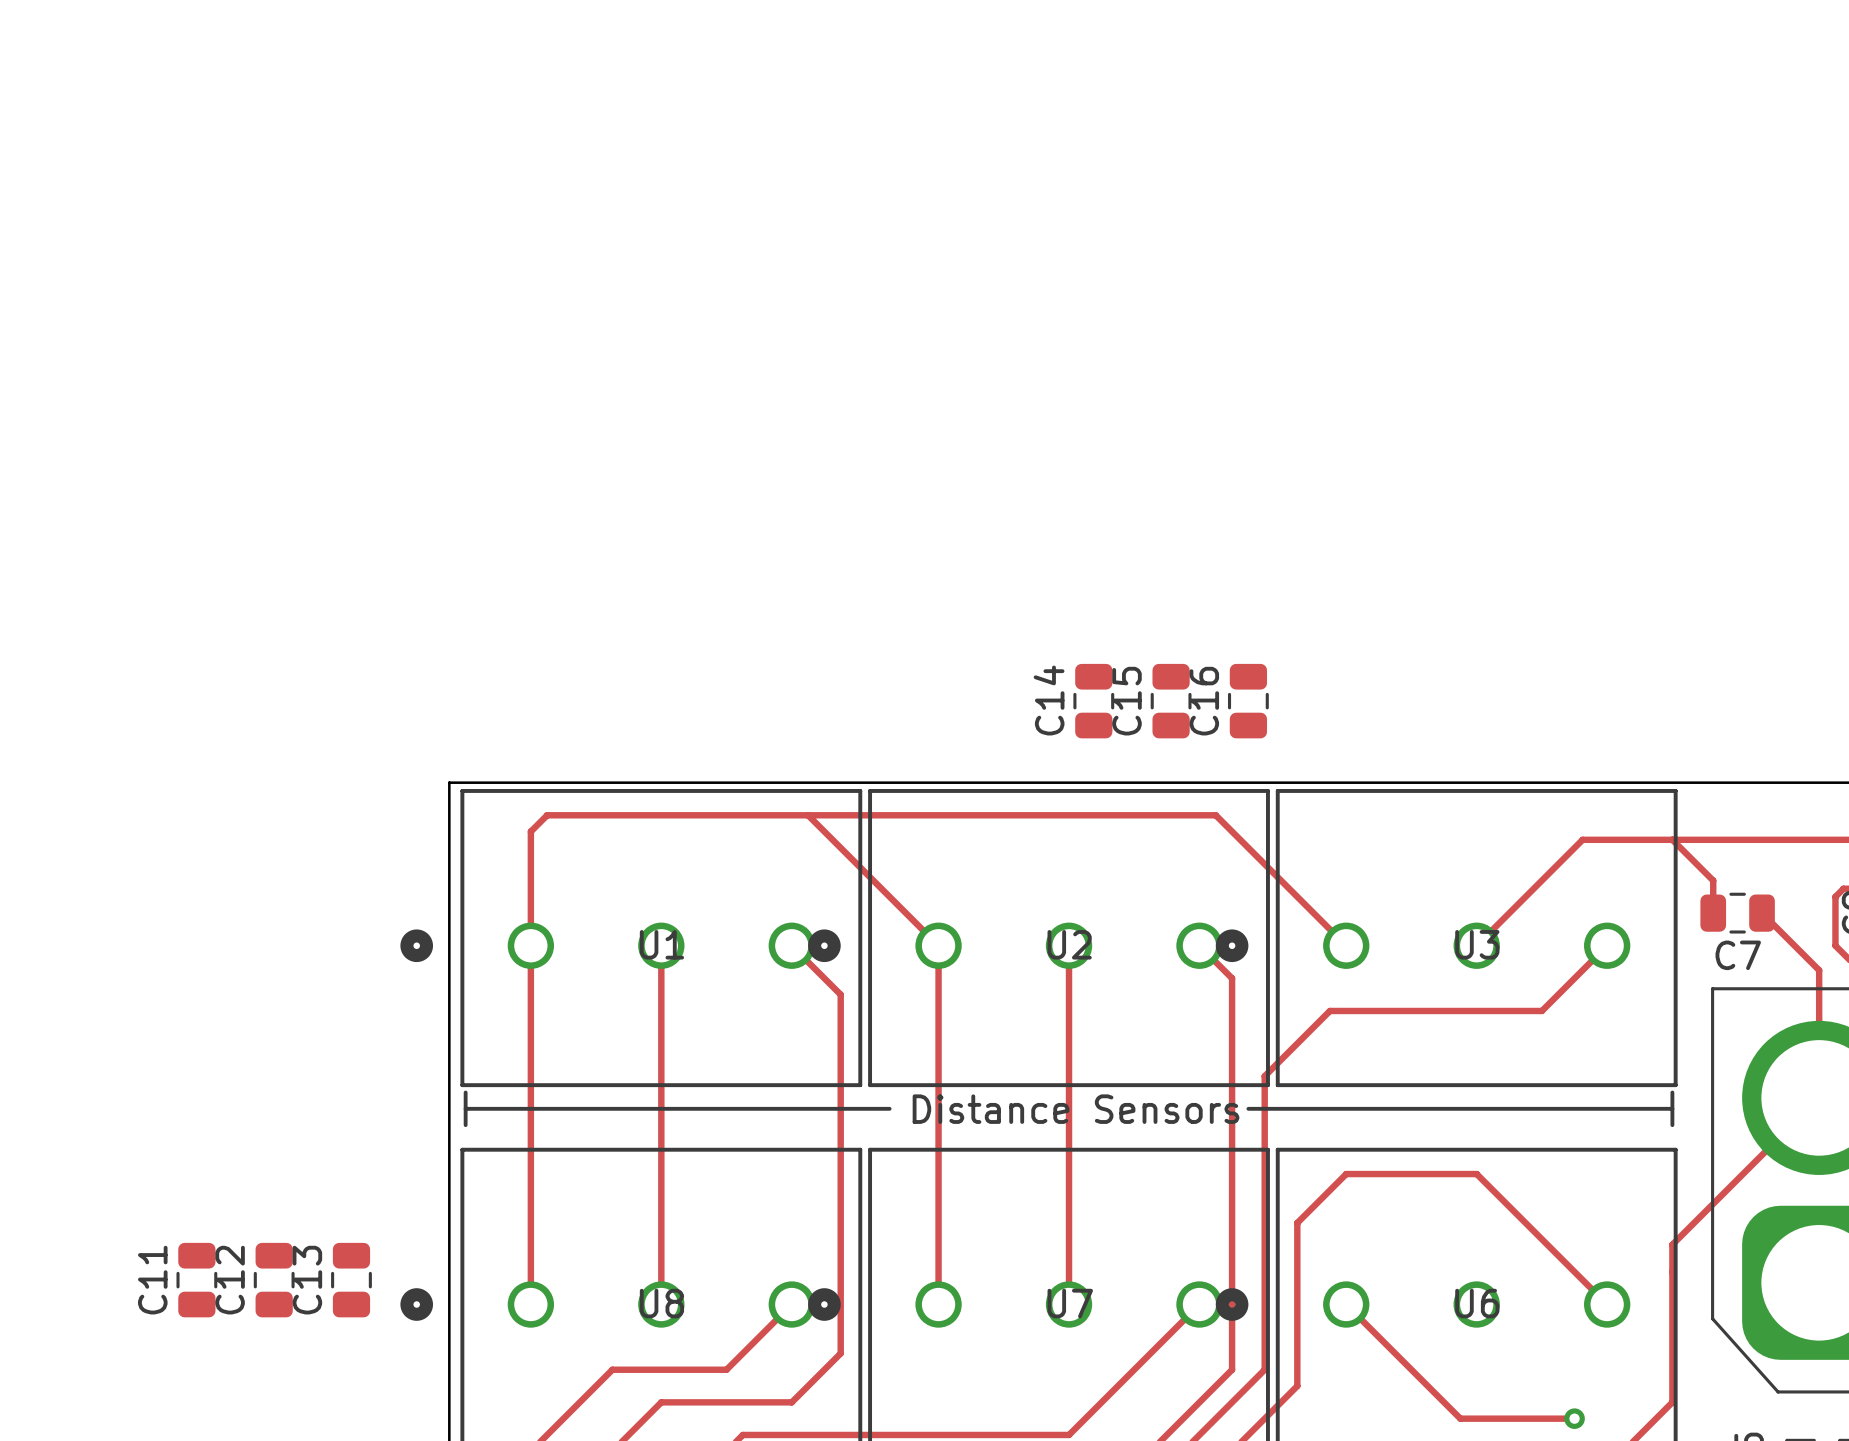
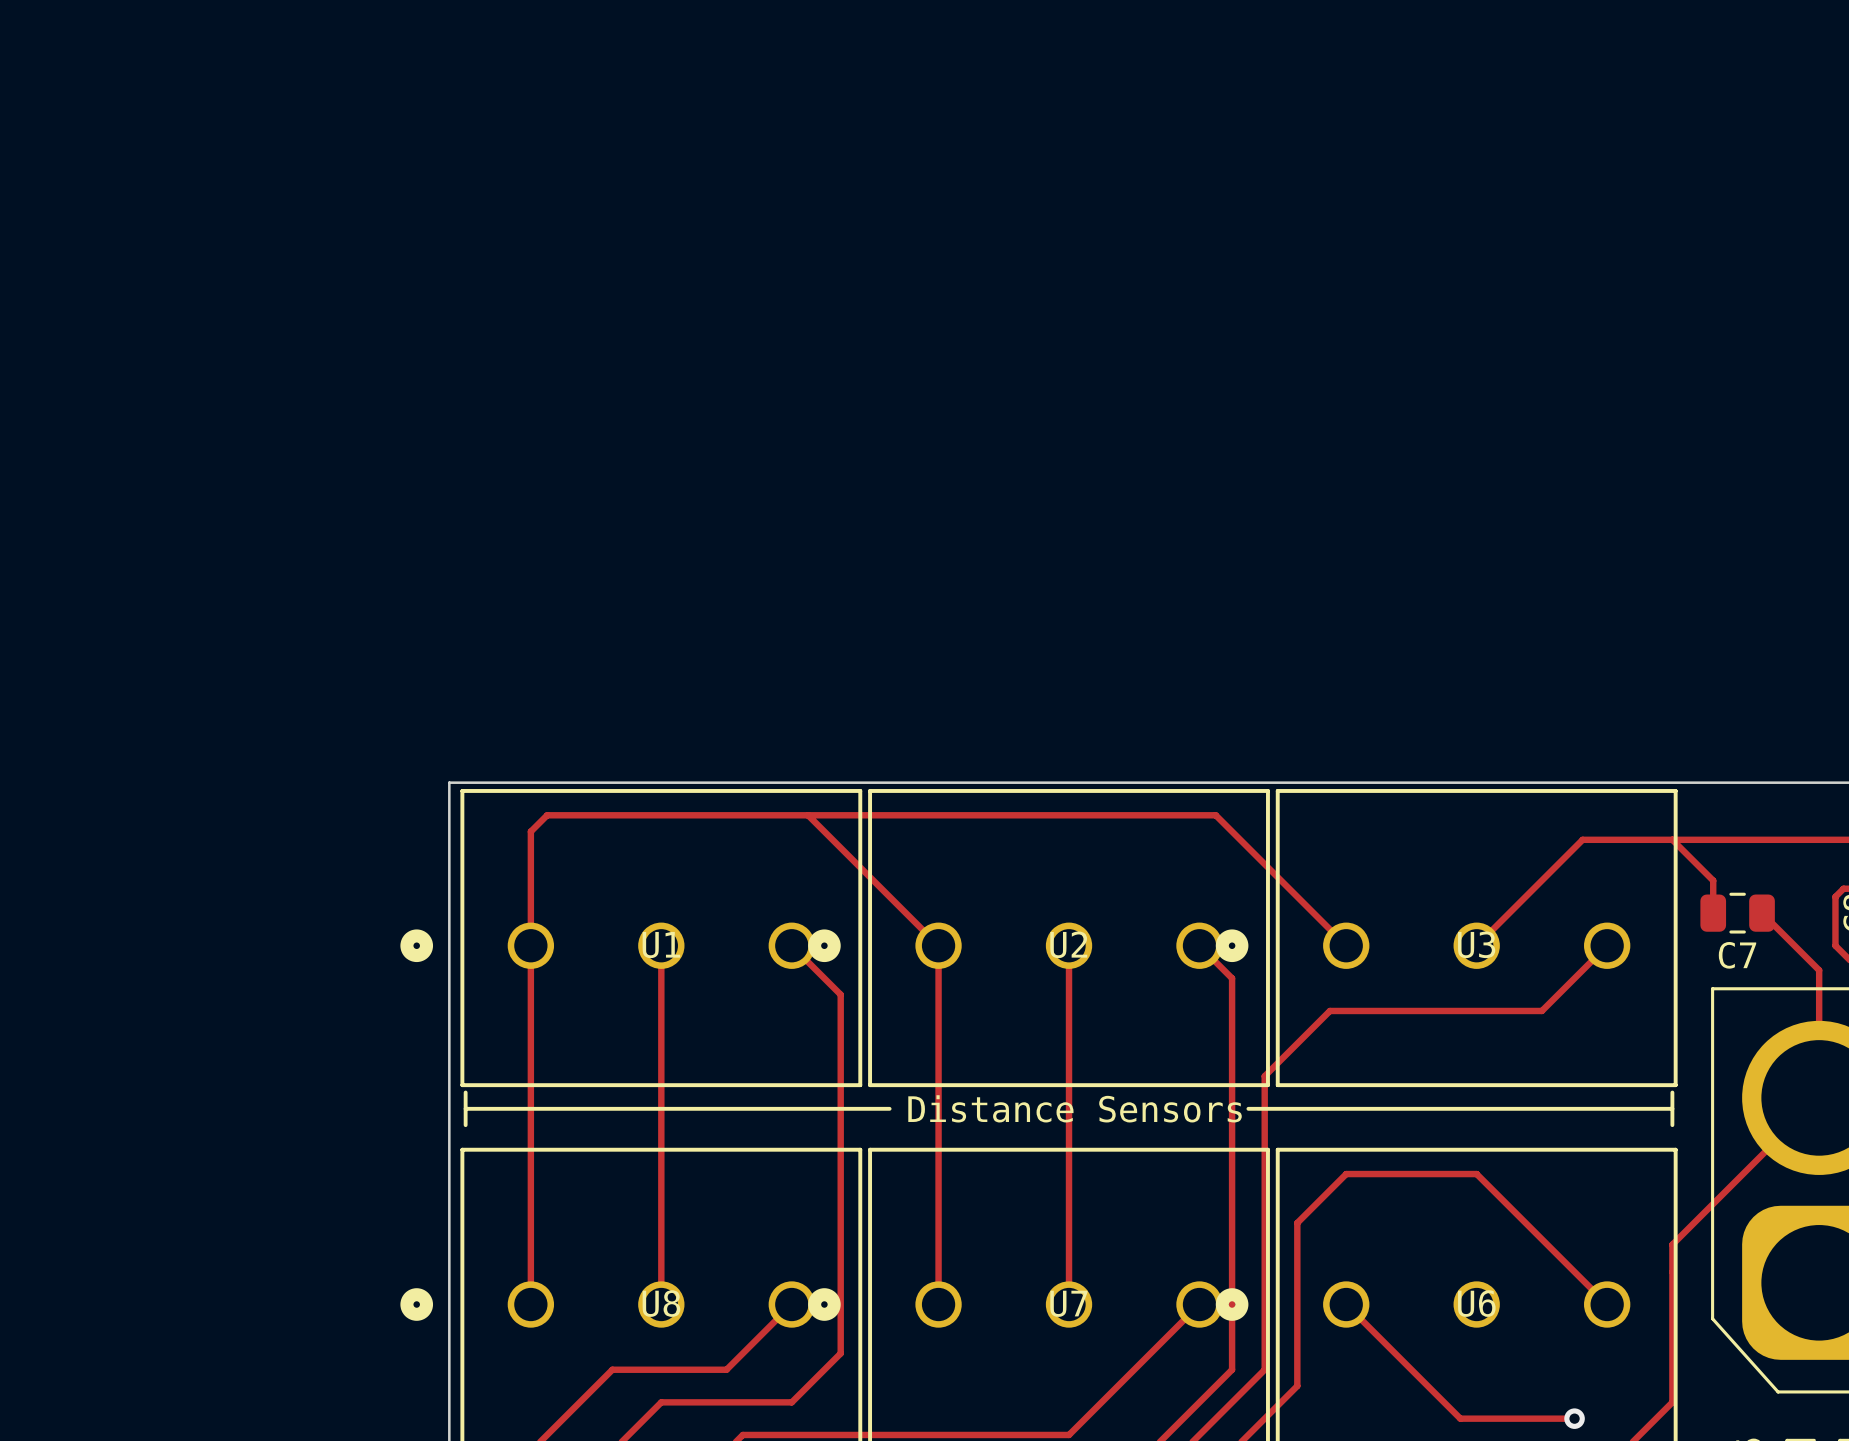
C14: (1093, 701) -> none
C15: (1171, 701) -> none
C16: (1248, 701) -> none
C11: (196, 1280) -> none
C12: (274, 1280) -> none
C13: (351, 1280) -> none

